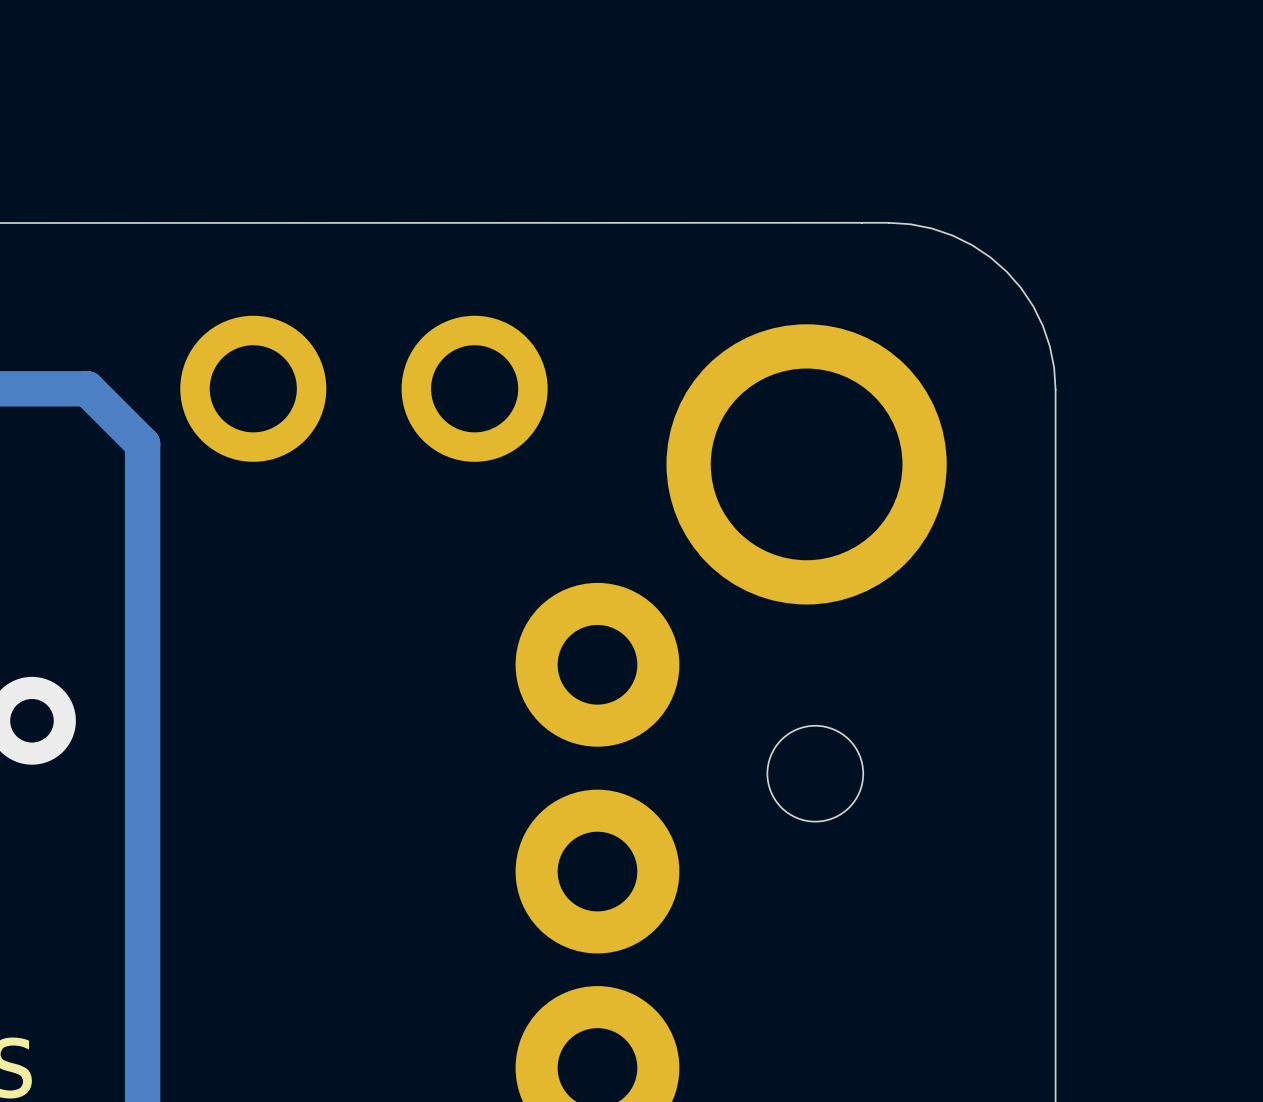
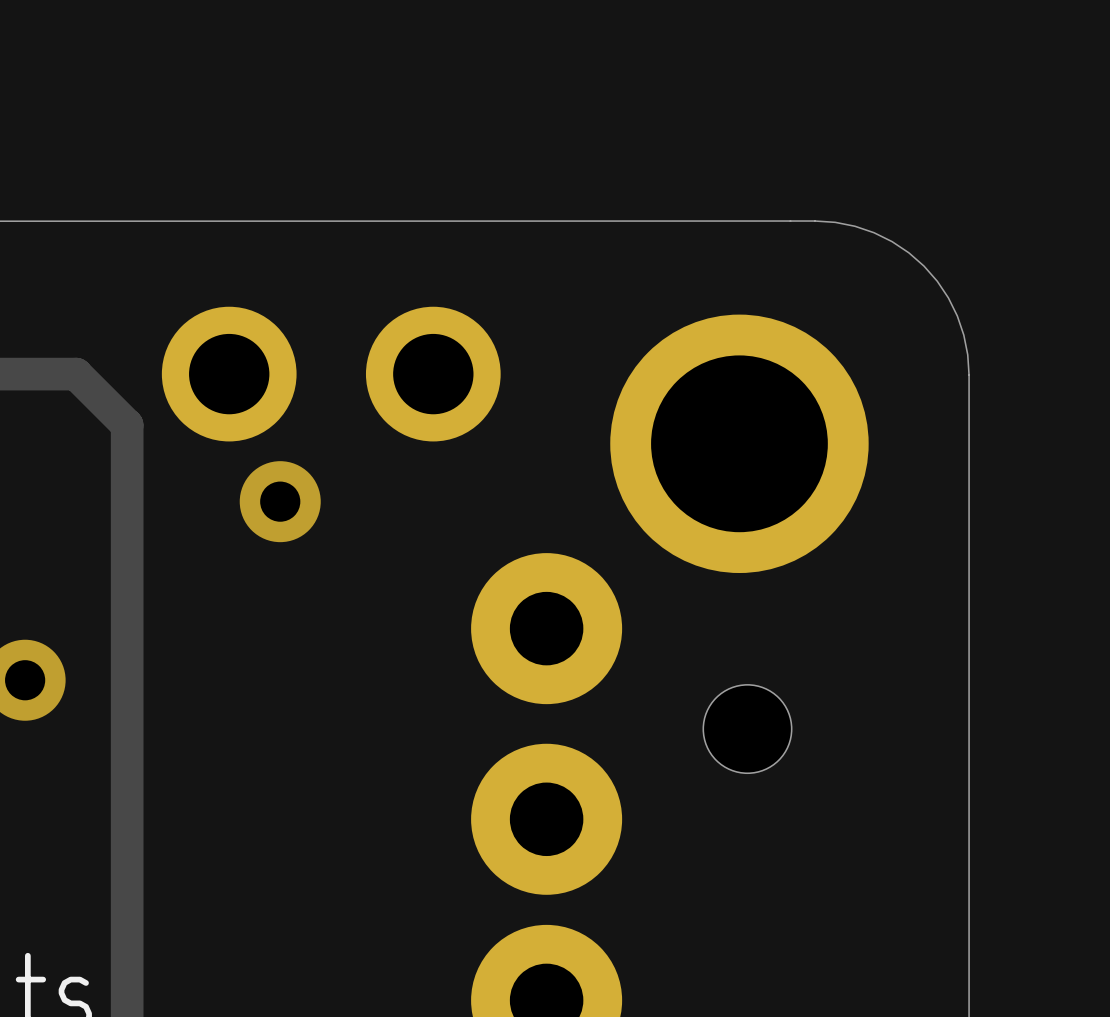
via: none -> (280, 501)

